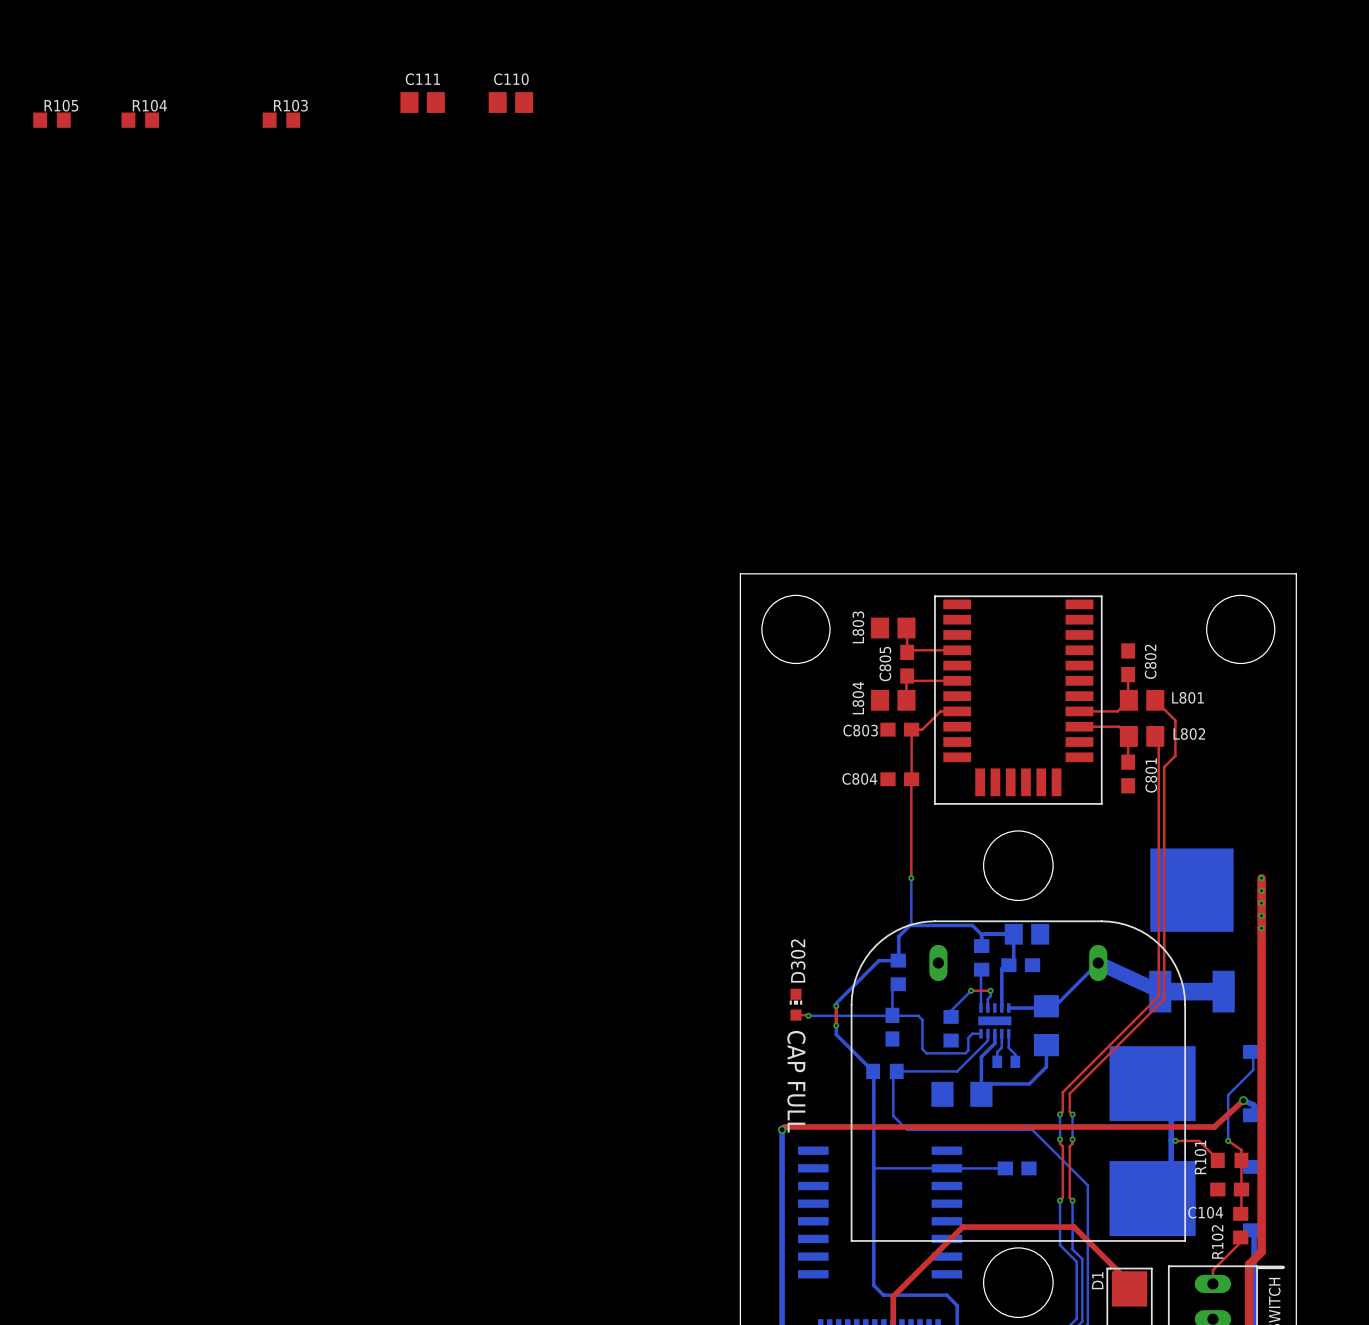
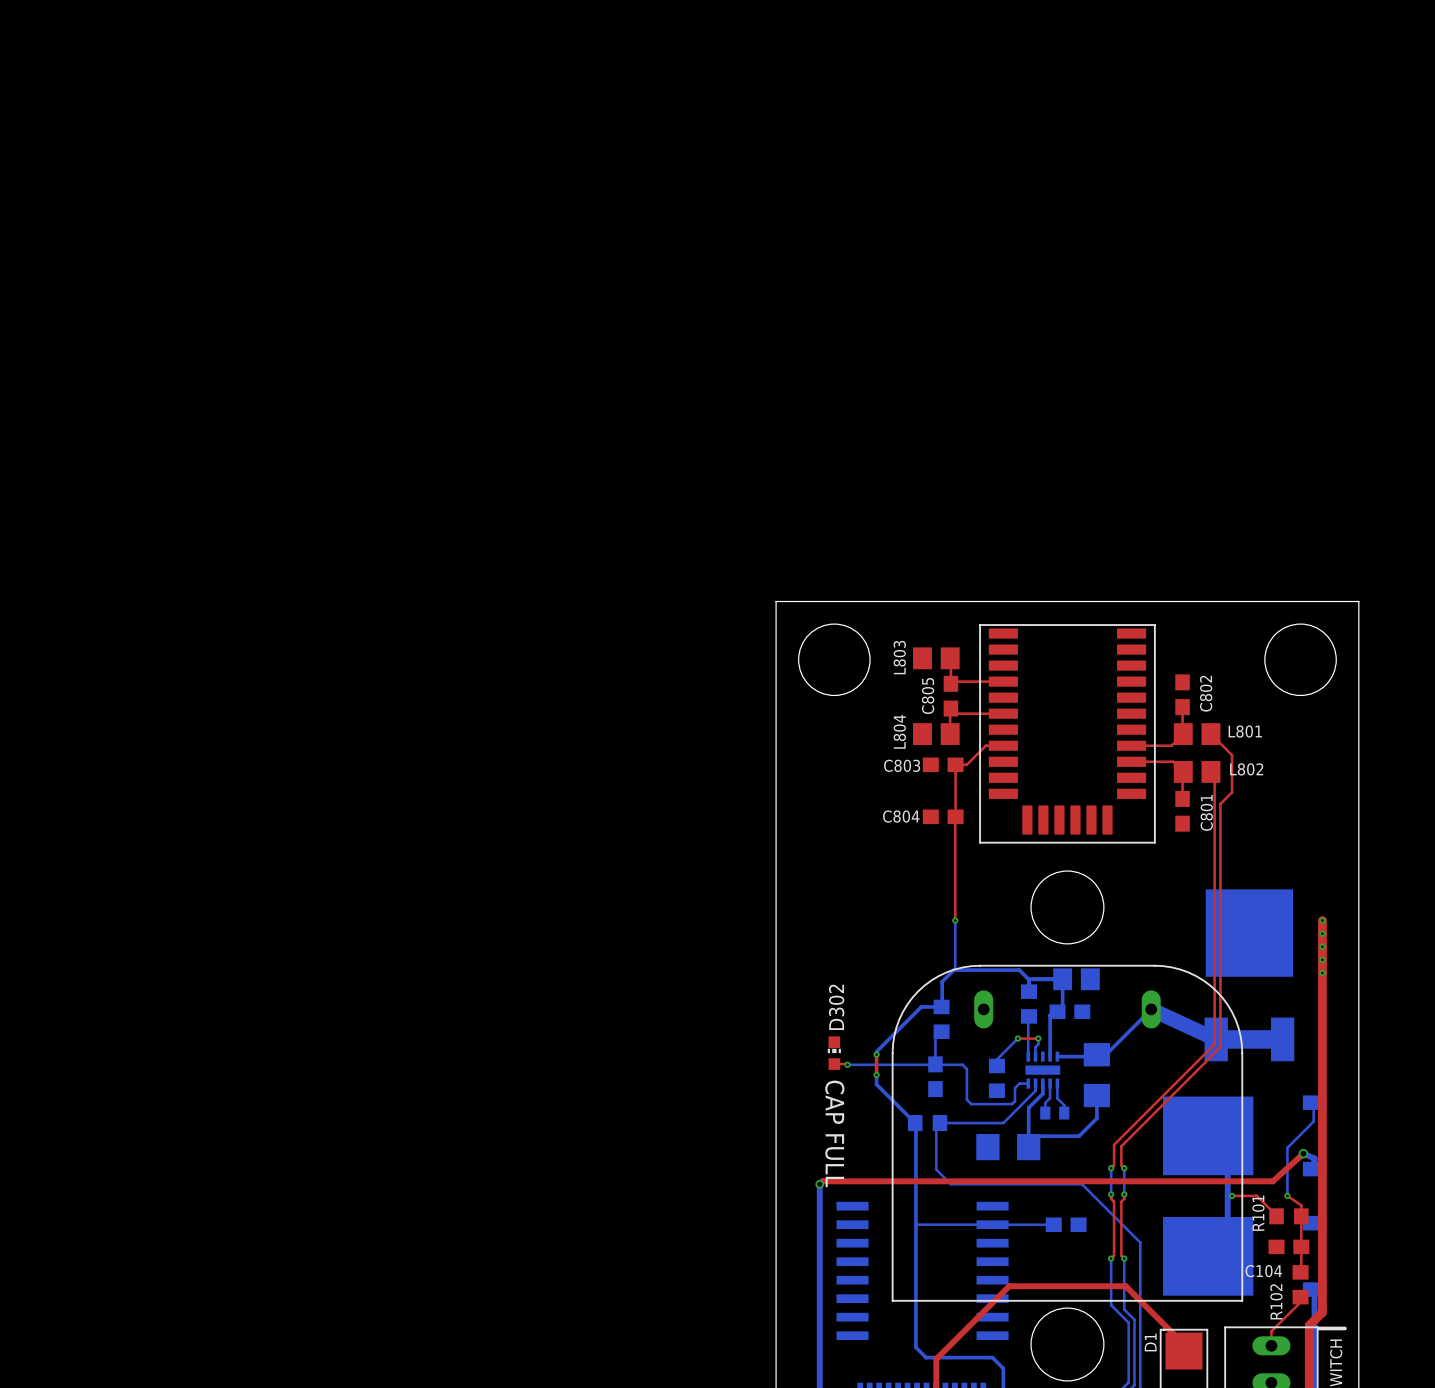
C111: (422, 102) -> none
C110: (510, 102) -> none
R105: (51, 120) -> none
R104: (140, 120) -> none
R103: (281, 120) -> none

